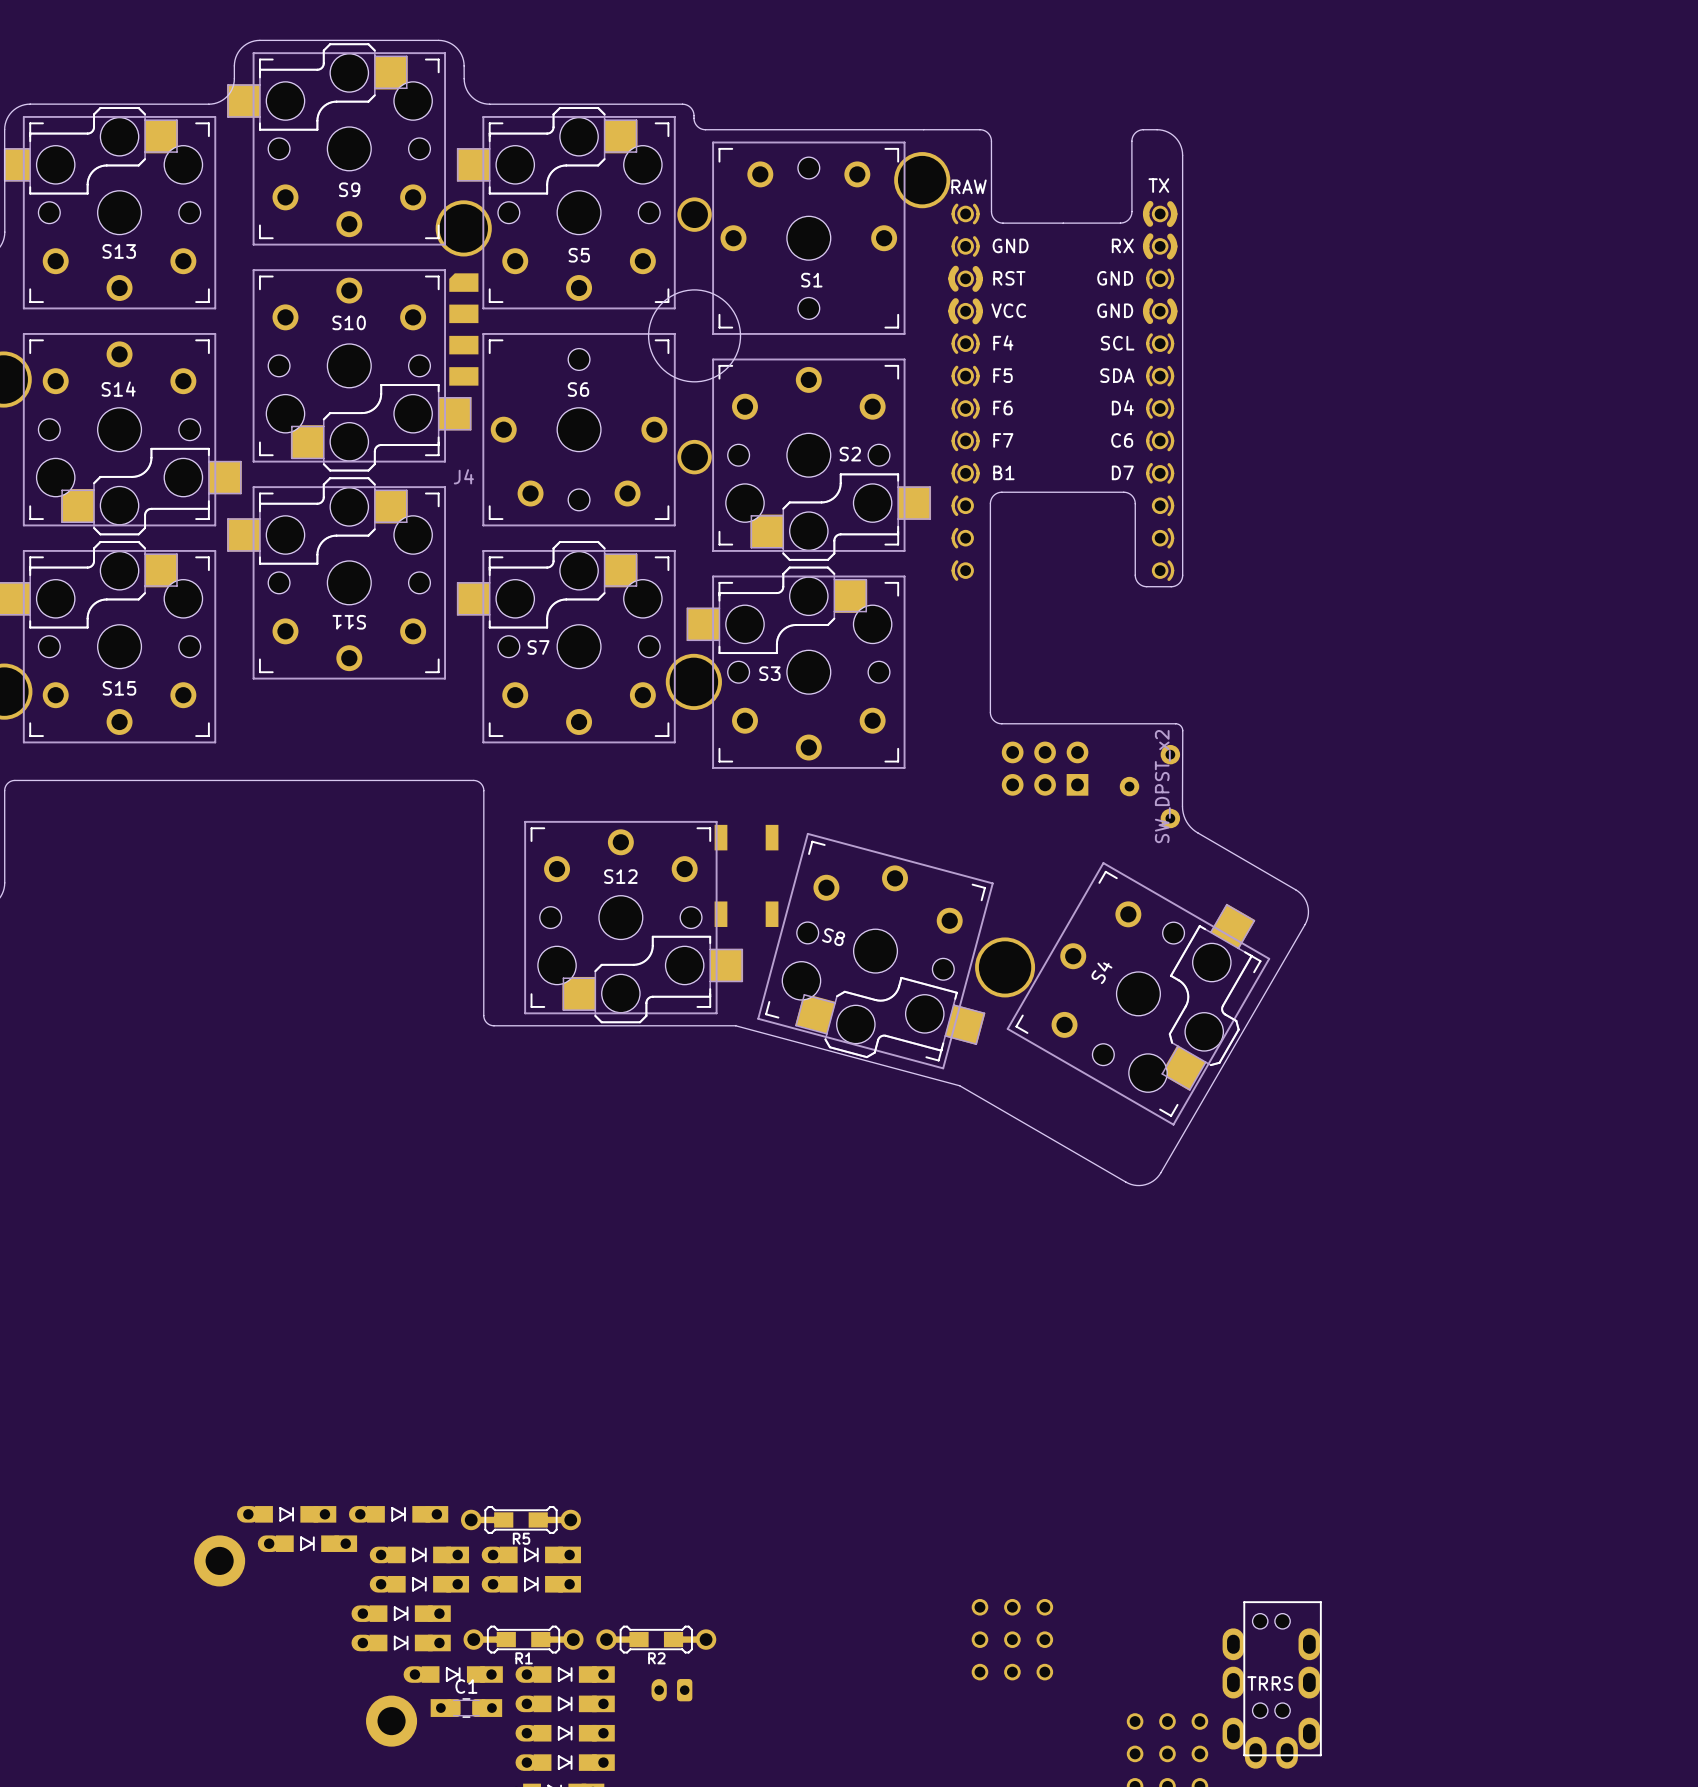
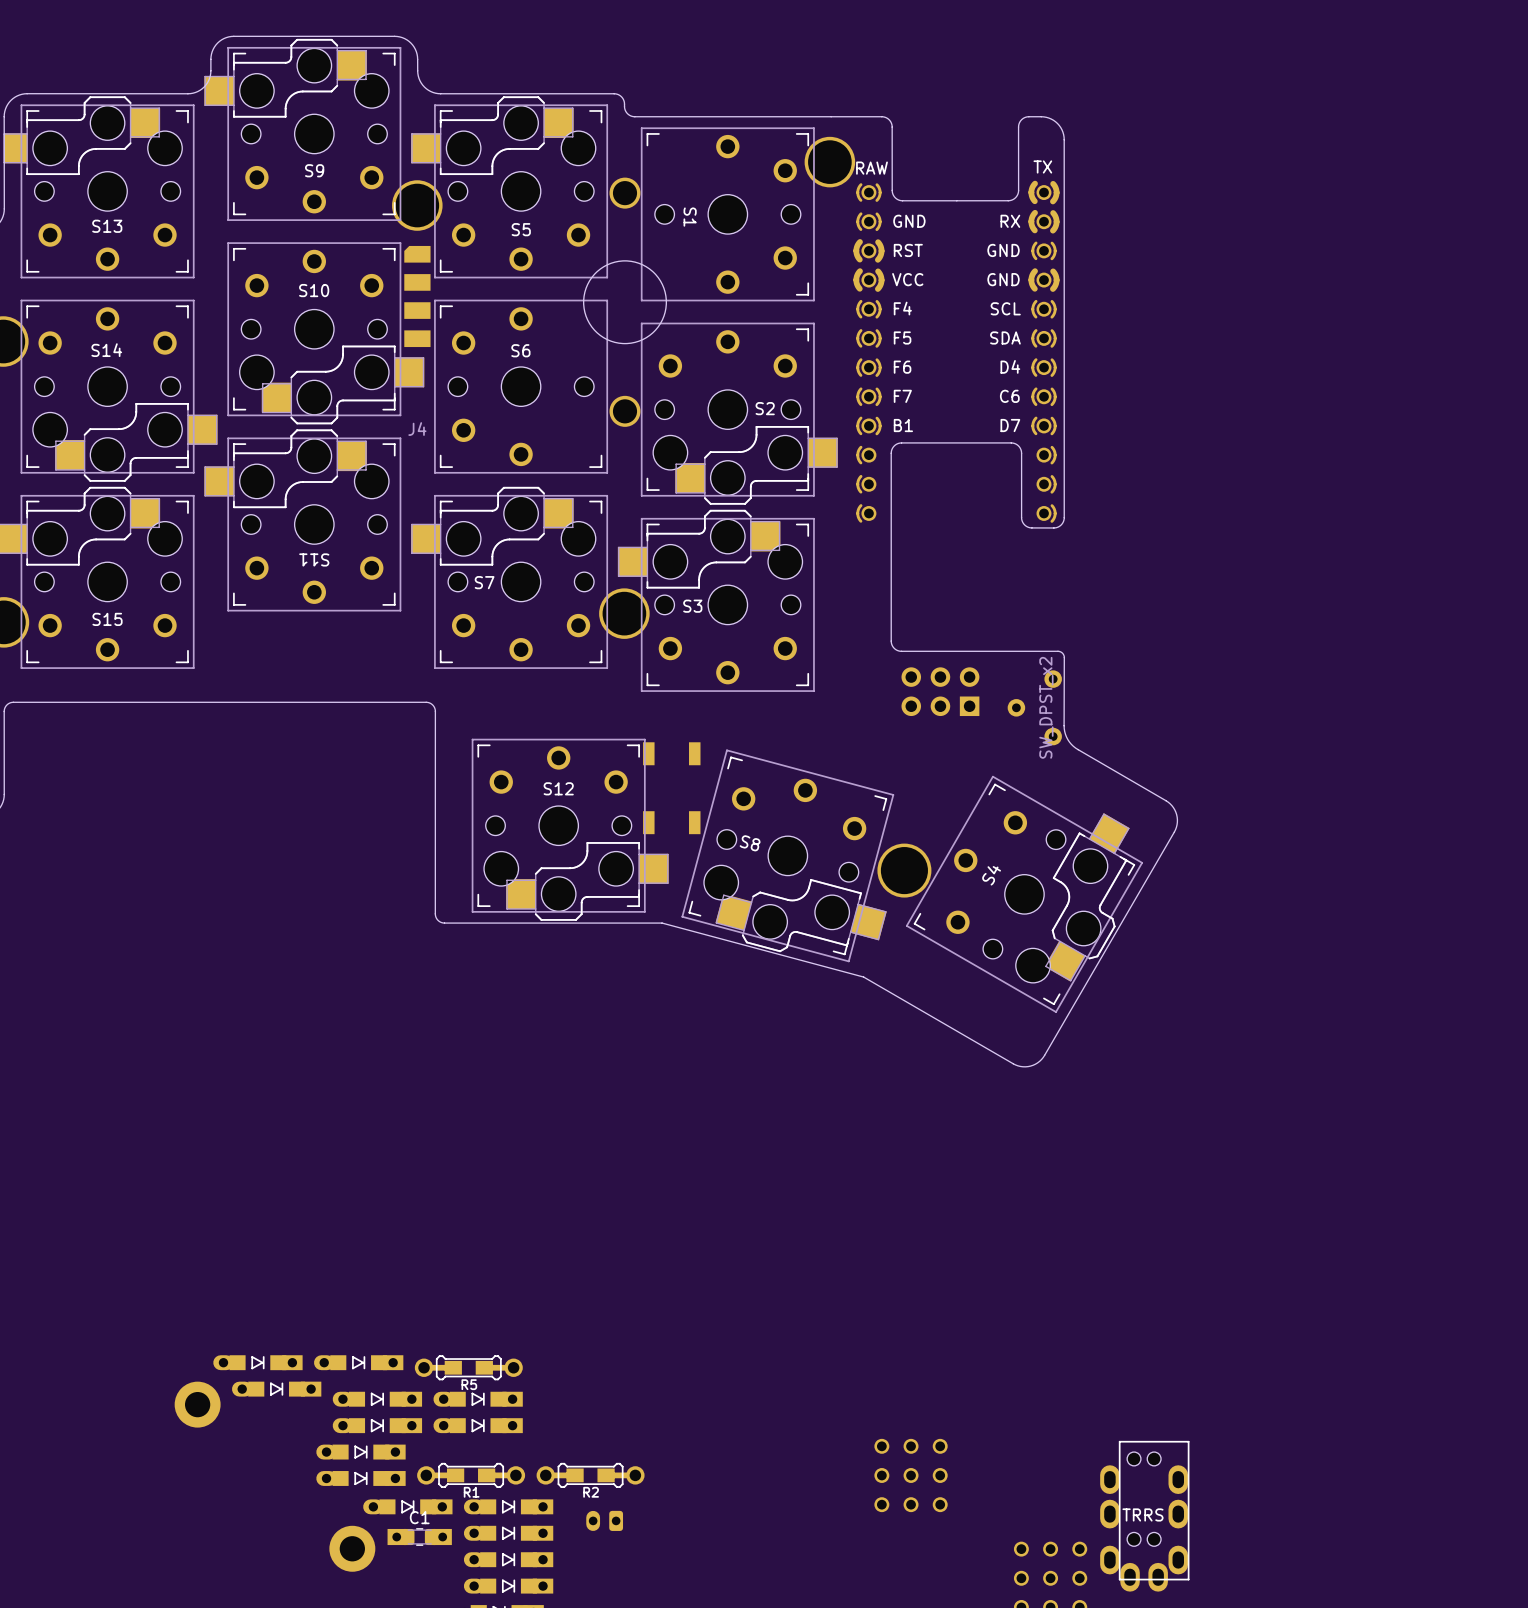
S5 footprint: [456, 107, 676, 310] -> [411, 96, 609, 279]
S1 footprint: [712, 141, 906, 335] -> [640, 127, 815, 302]
S1 name position: S1 (811, 280) -> S1 (690, 217)
S6 footprint: [482, 333, 676, 527] -> [434, 299, 609, 474]
S2 footprint: [712, 358, 932, 561] -> [640, 322, 838, 505]

